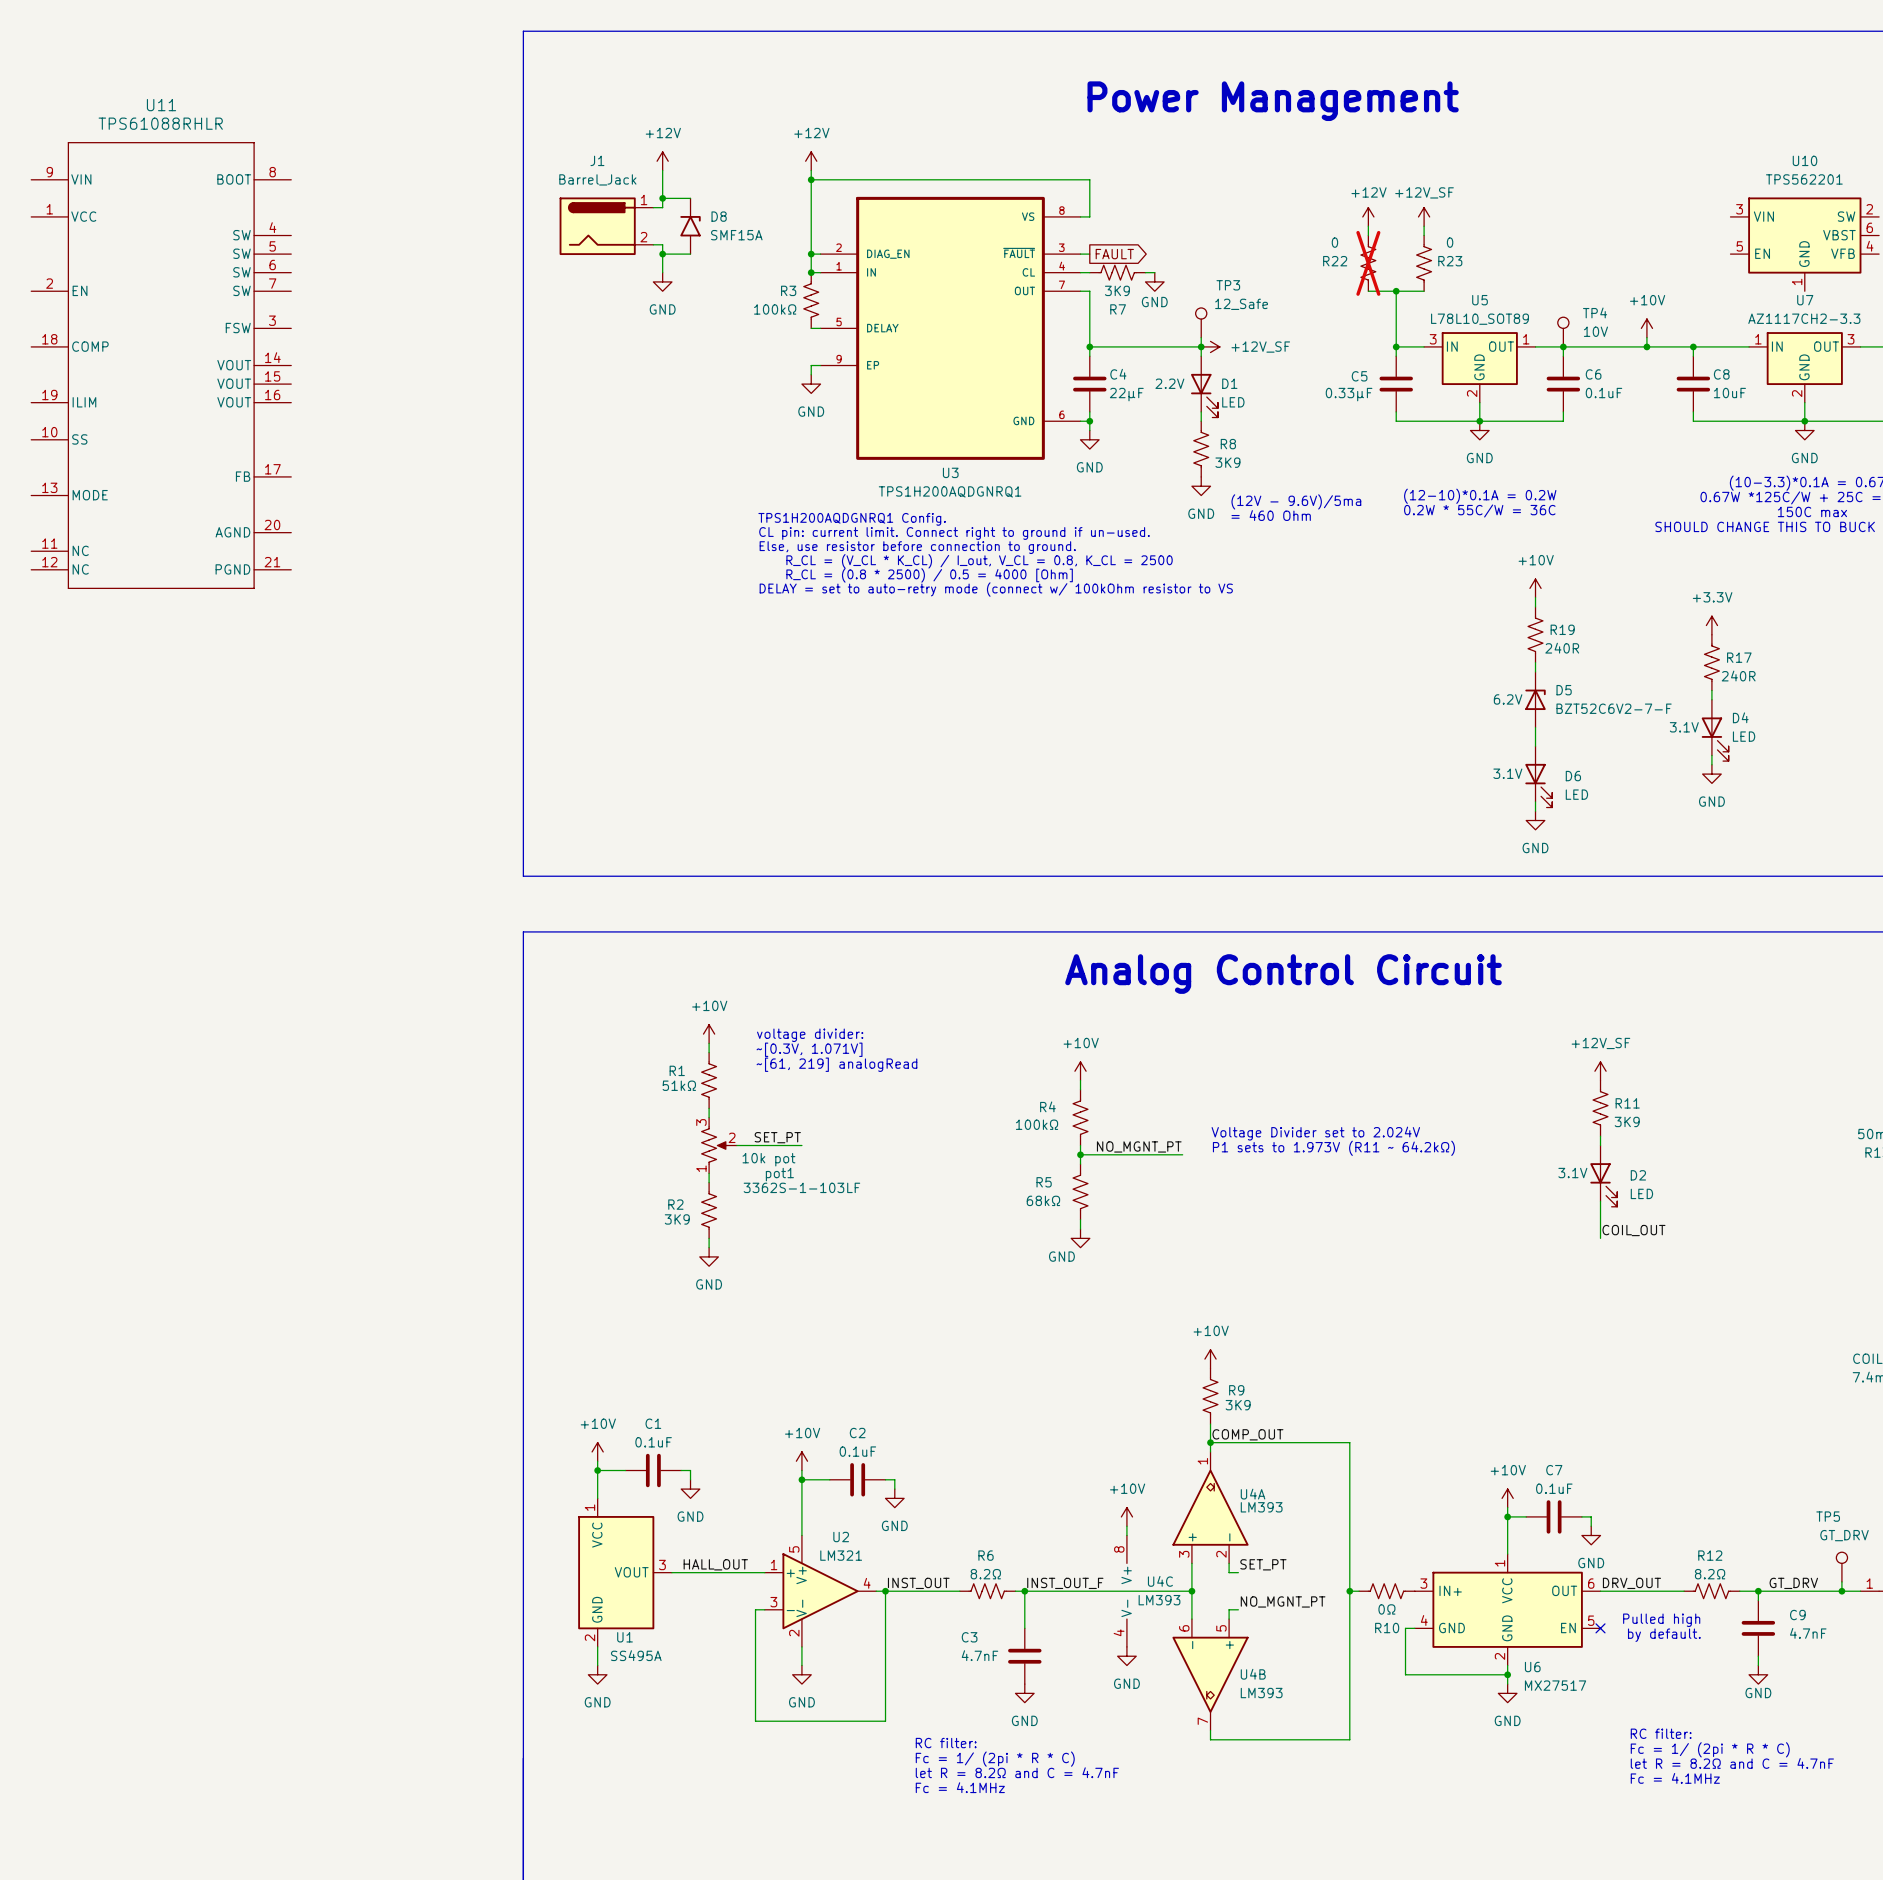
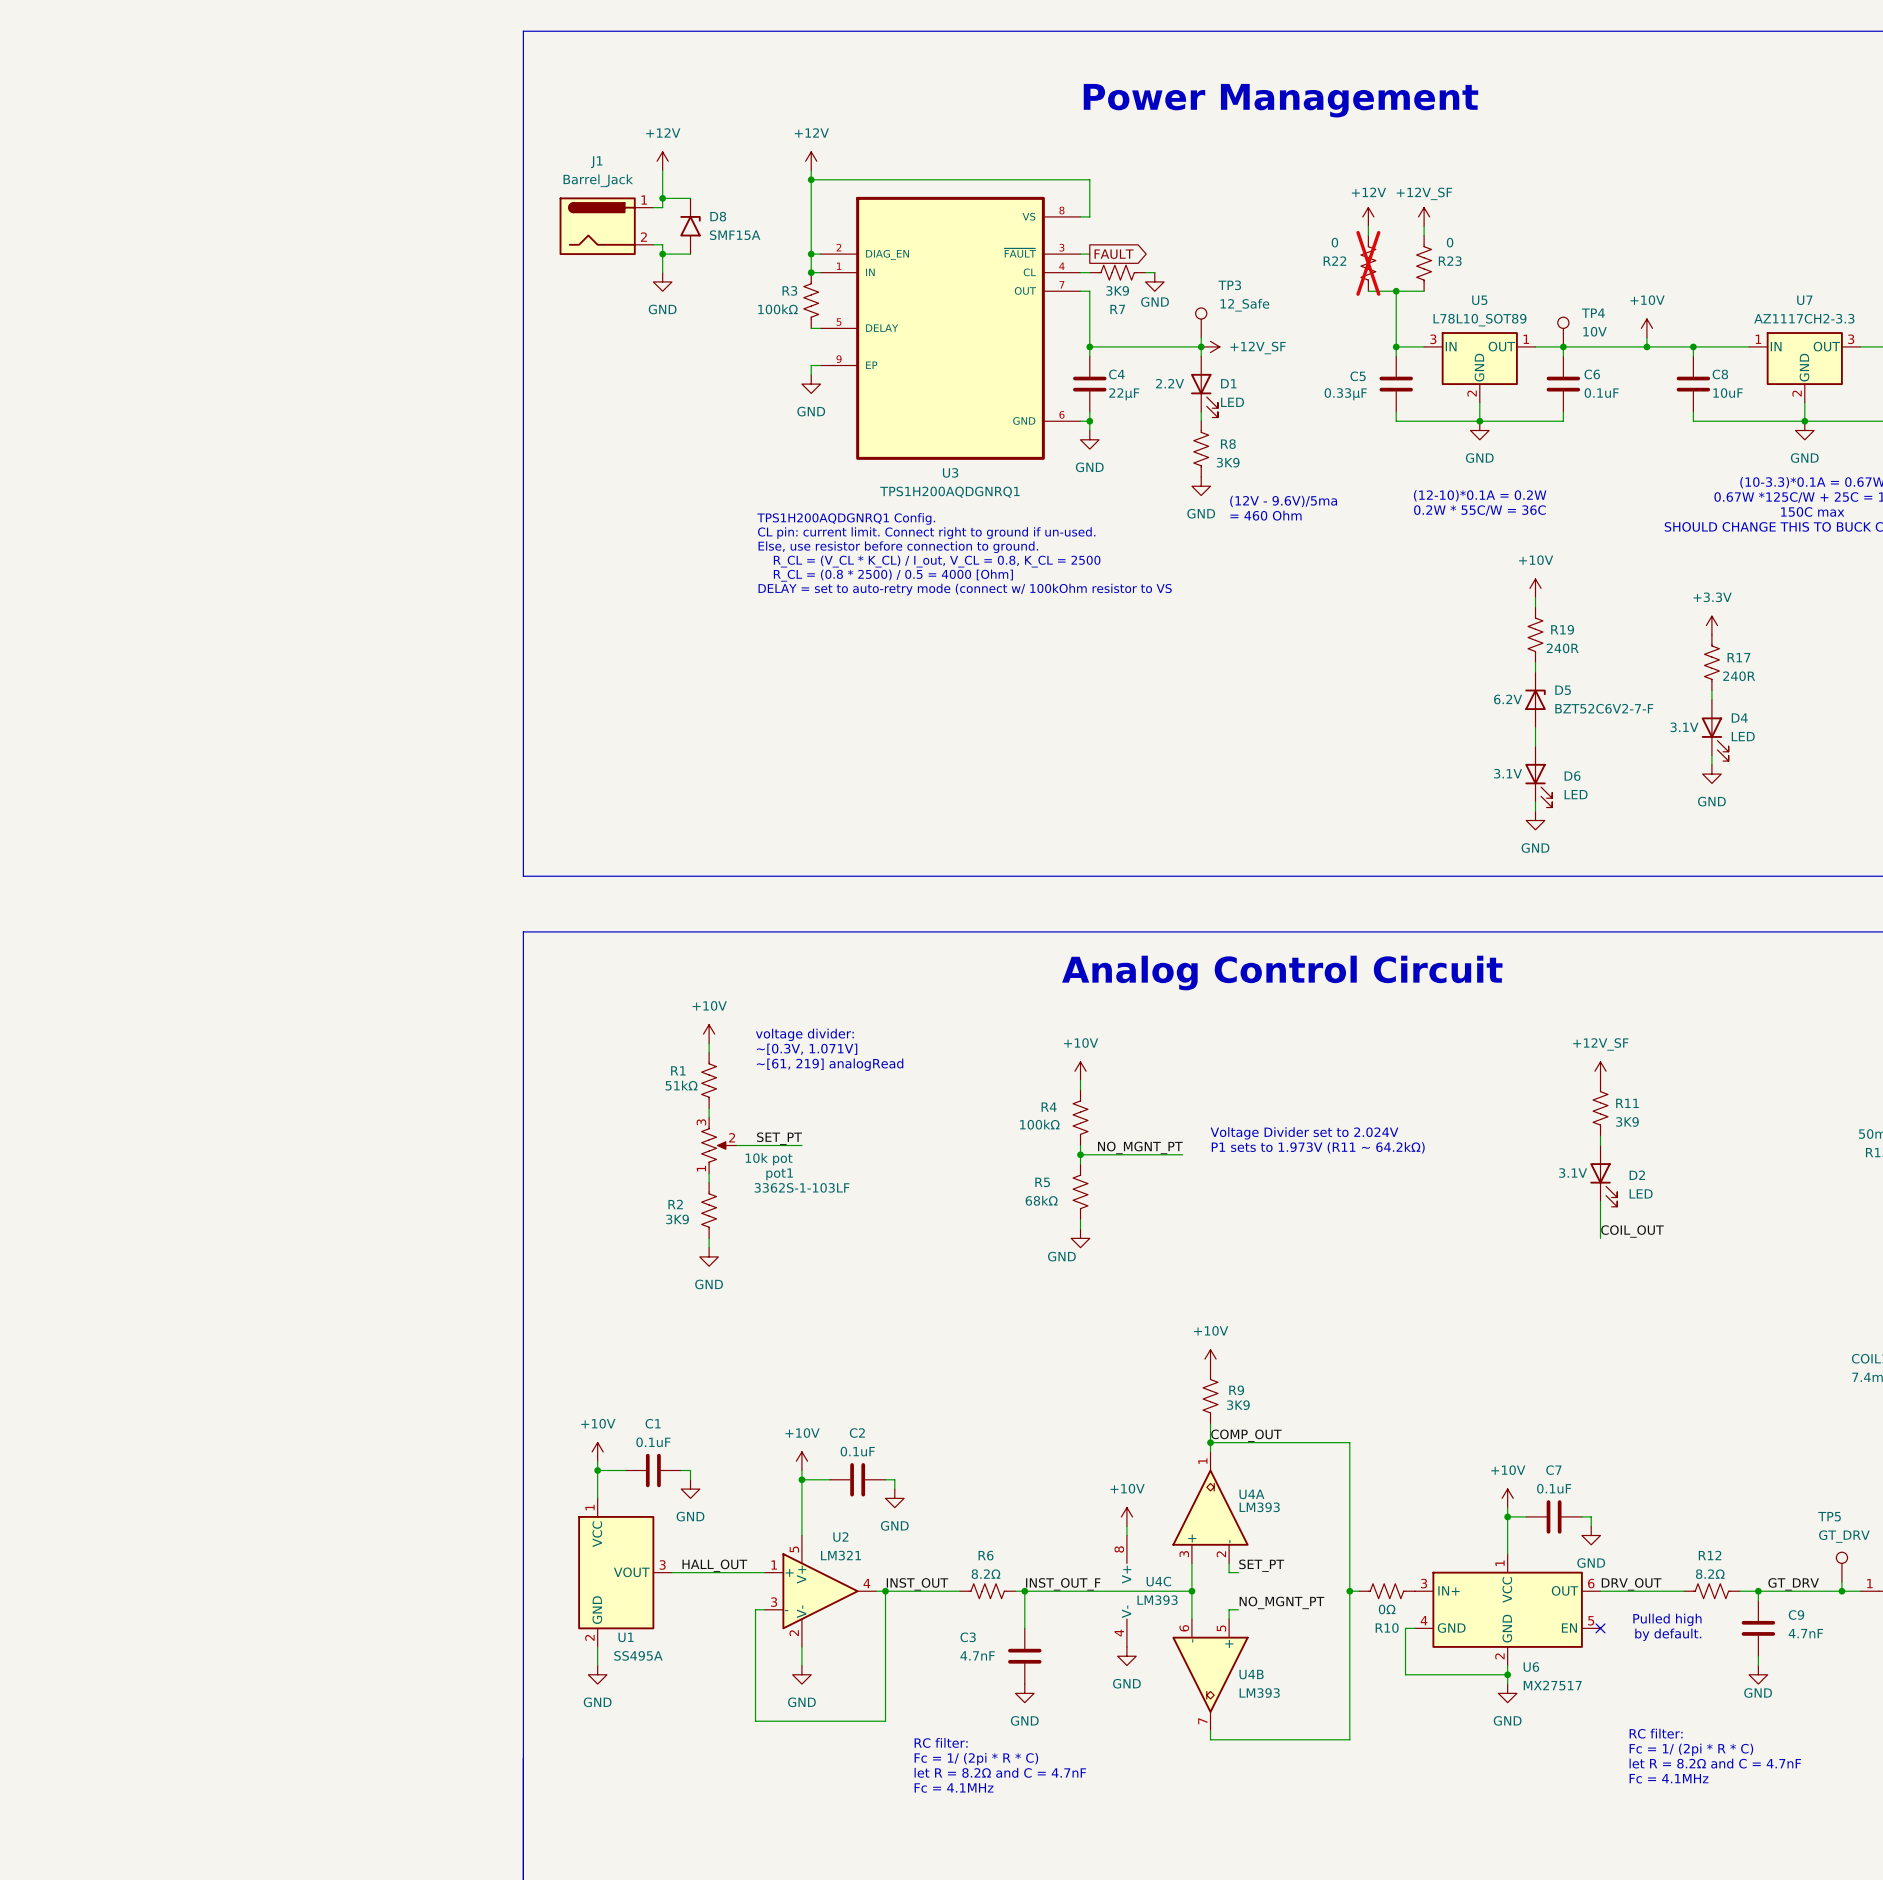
U10: TPS562201 (1804, 244) -> none
U11: TPS61088RHLR (161, 365) -> none

